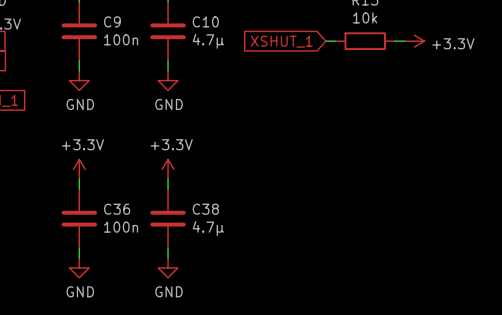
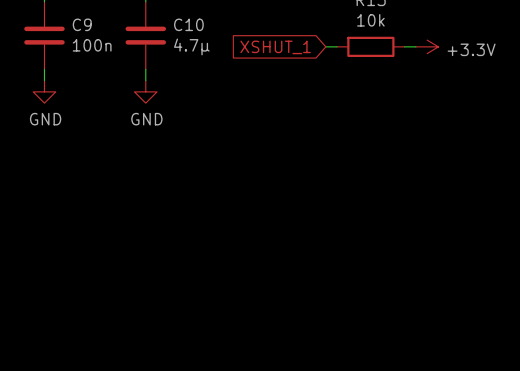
power symbol: +3.3V (79, 169) -> none
power symbol: +3.3V (168, 169) -> none
wire: (79, 179) (79, 189) -> none
wire: (168, 179) (168, 189) -> none
C36: 100n (79, 218) -> none
C38: 4.7µ (168, 218) -> none
wire: (79, 248) (79, 258) -> none
wire: (168, 248) (168, 258) -> none
power symbol: GND (79, 267) -> none
power symbol: GND (168, 267) -> none

